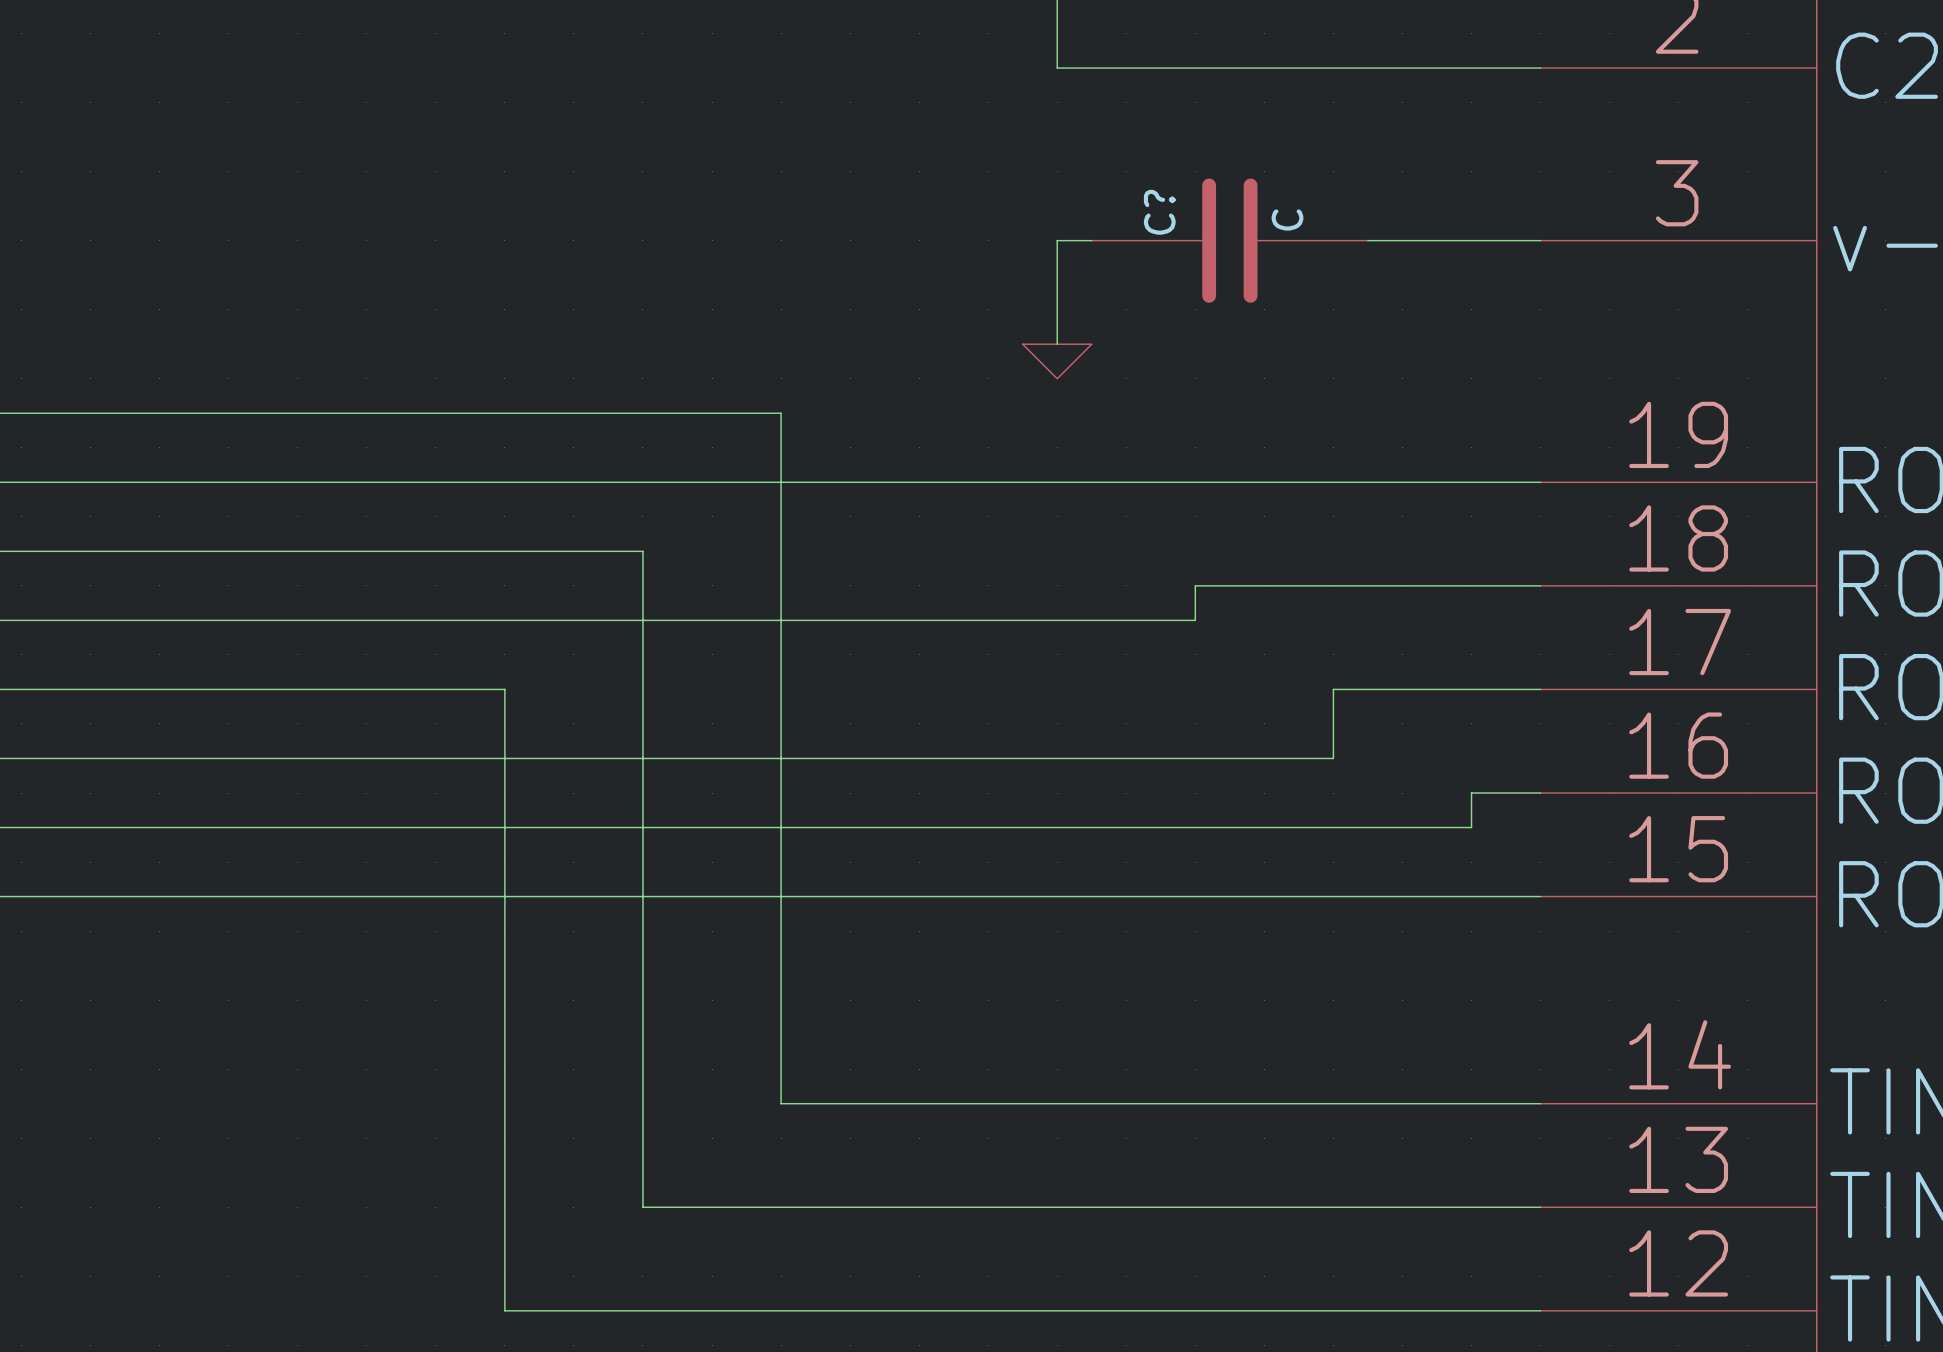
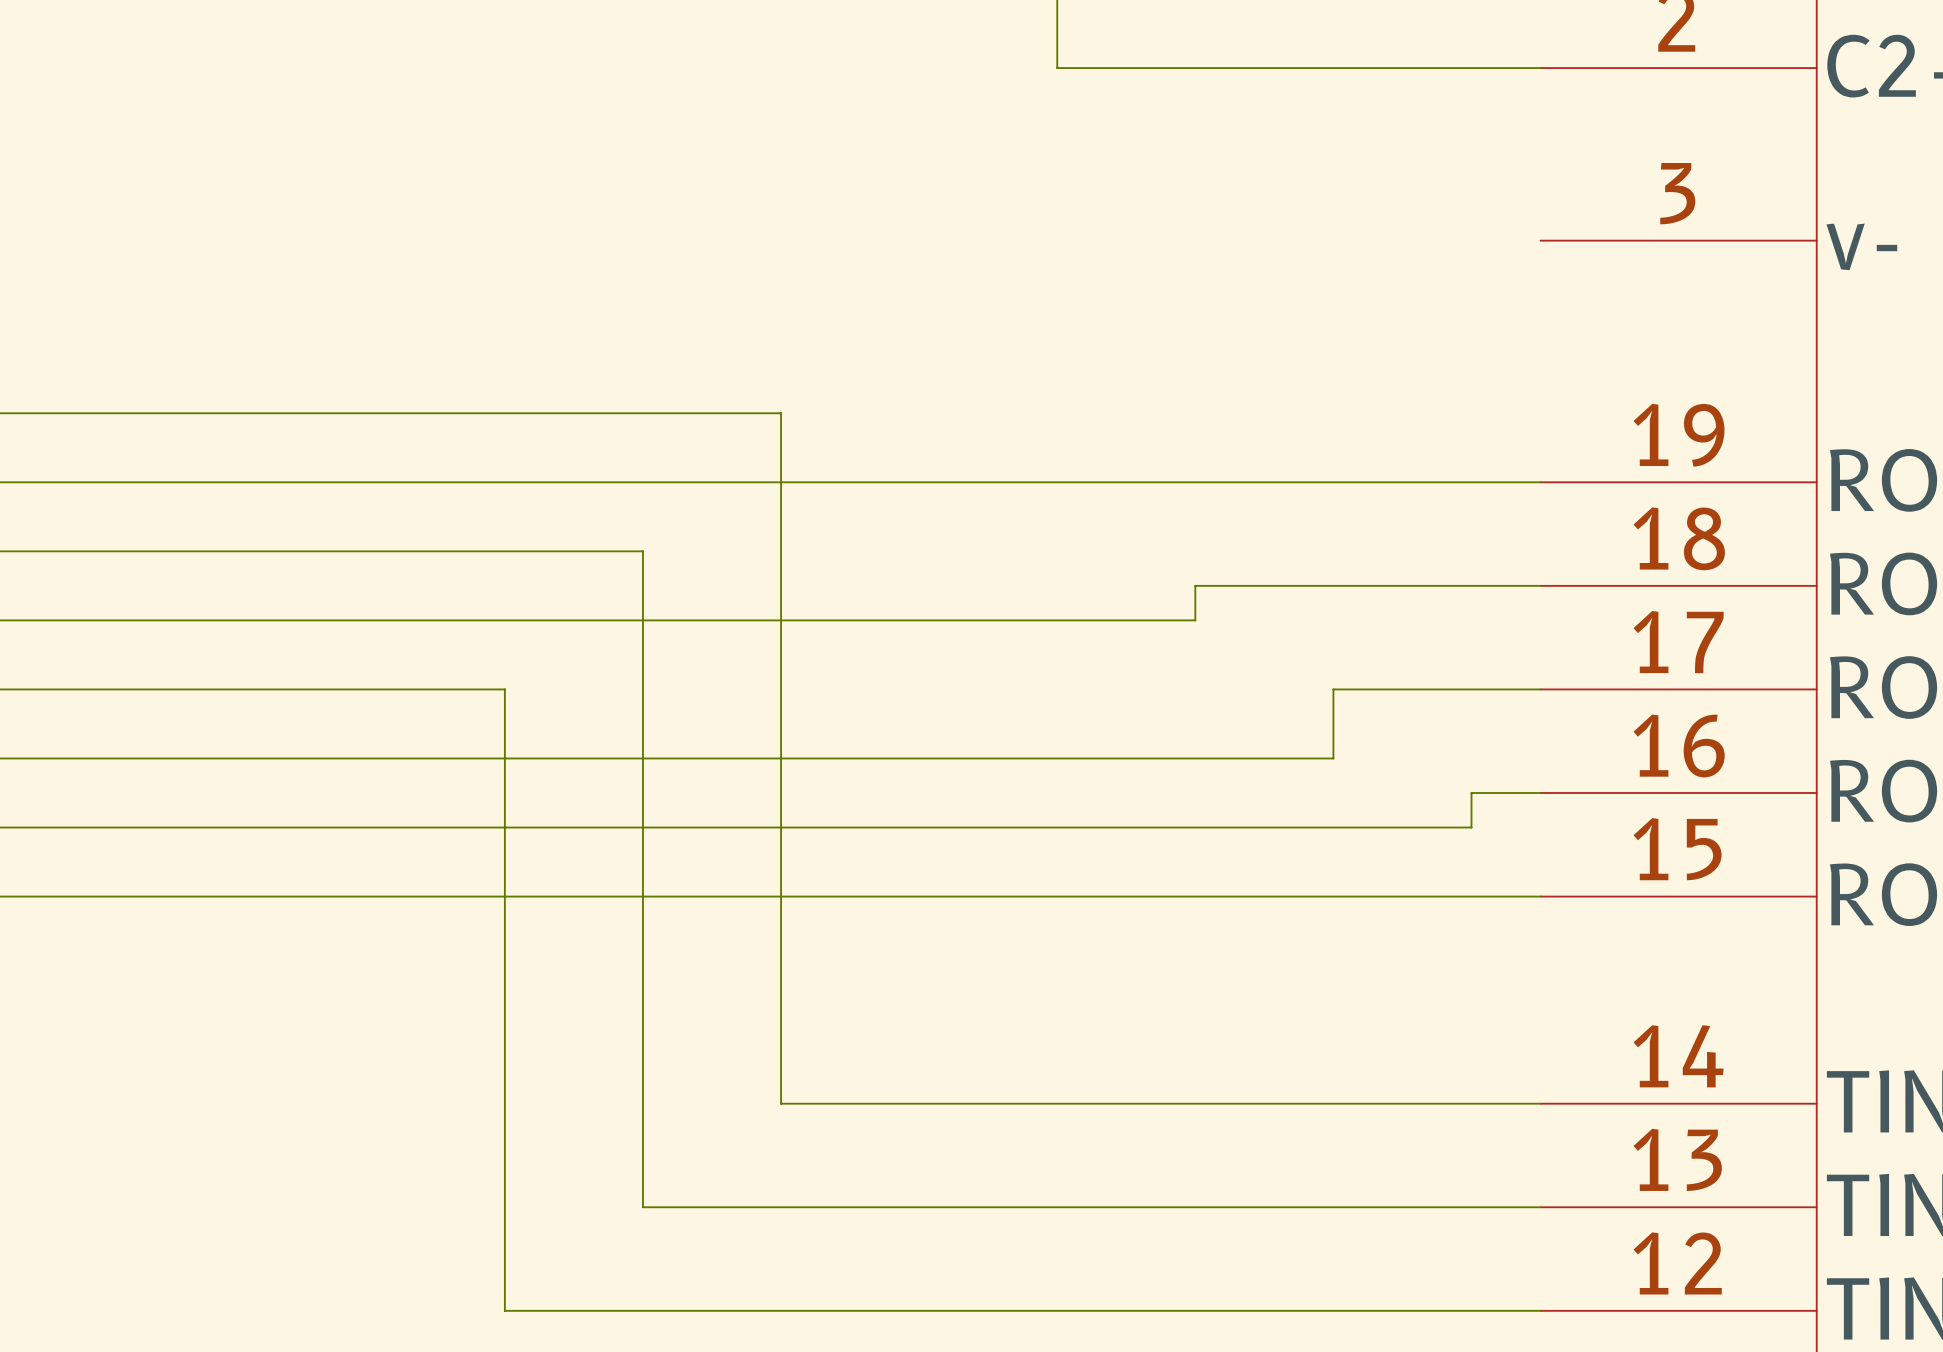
wire: (1091, 240) (1057, 240) (1057, 344) -> none
C?: C (1229, 240) -> none
wire: (1367, 240) (1540, 240) -> none
power symbol: (1057, 361) -> none

